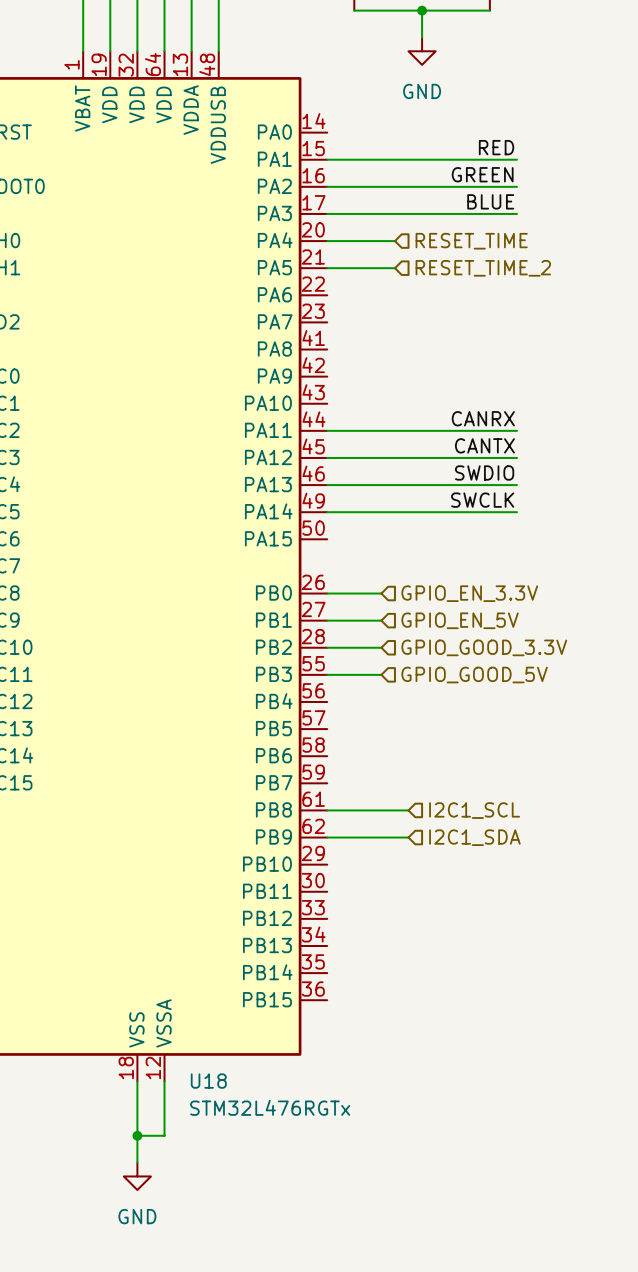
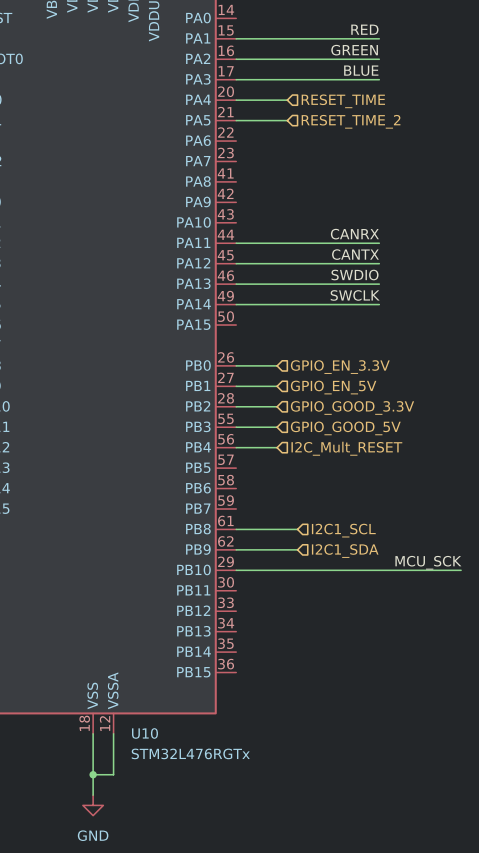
wire: none -> (236, 447) (277, 447)
hierarchical label: none -> I2C_Mult_RESET (346, 448)
label: none -> MCU_SCK (428, 562)
wire: none -> (236, 570) (461, 570)
U18 name: U18 (208, 1081) -> U10 (145, 733)

